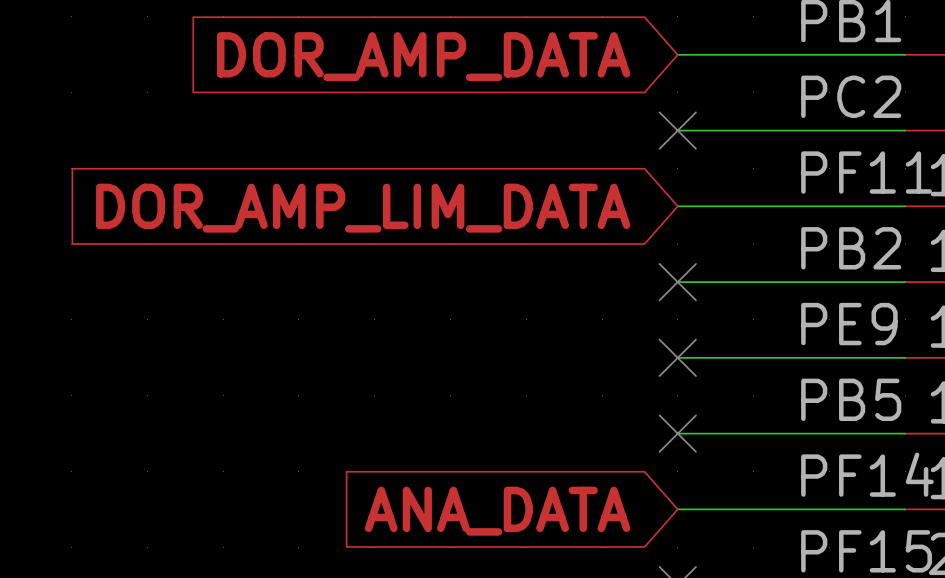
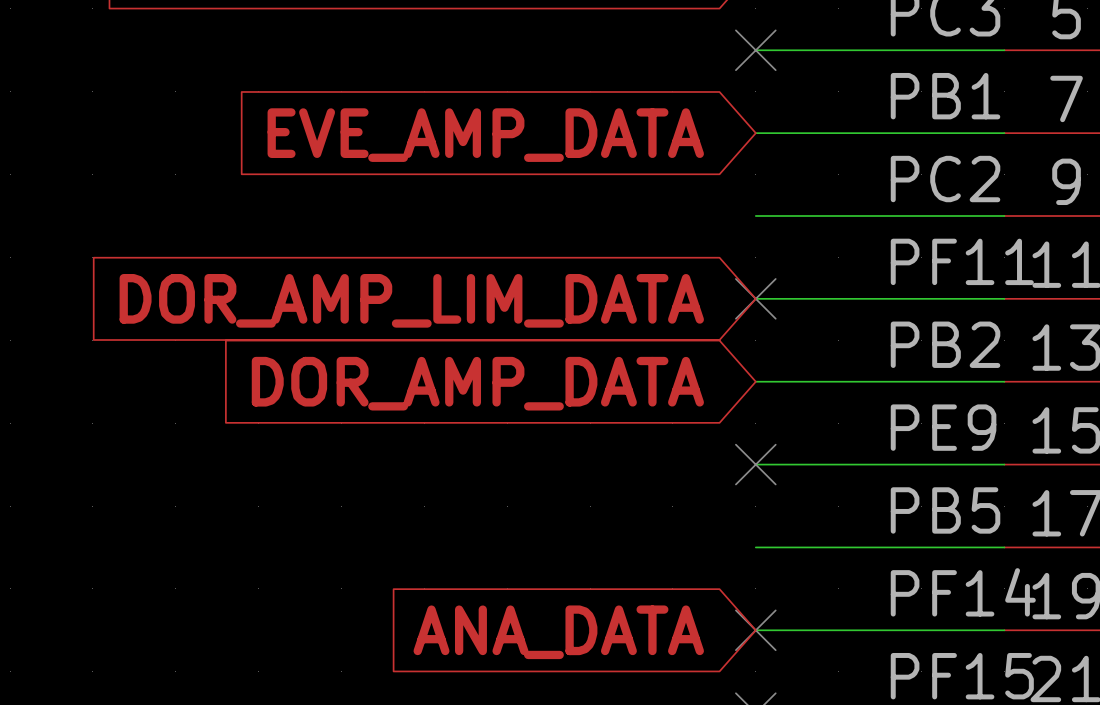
global label: DOR_AMP_DATA (423, 56) -> EVE_AMP_DATA (485, 135)
no-connect mark: (677, 130) -> none
no-connect mark: none -> (755, 298)
no-connect mark: (677, 282) -> none
global label: none -> DOR_AMP_DATA (477, 383)
no-connect mark position: (677, 433) -> (755, 630)

